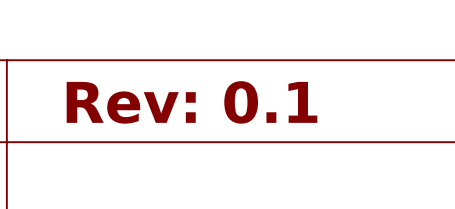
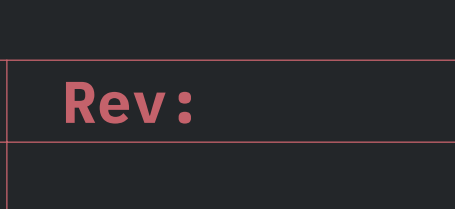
title block: Rev: 0.1 (191, 102) -> Rev: (128, 102)

